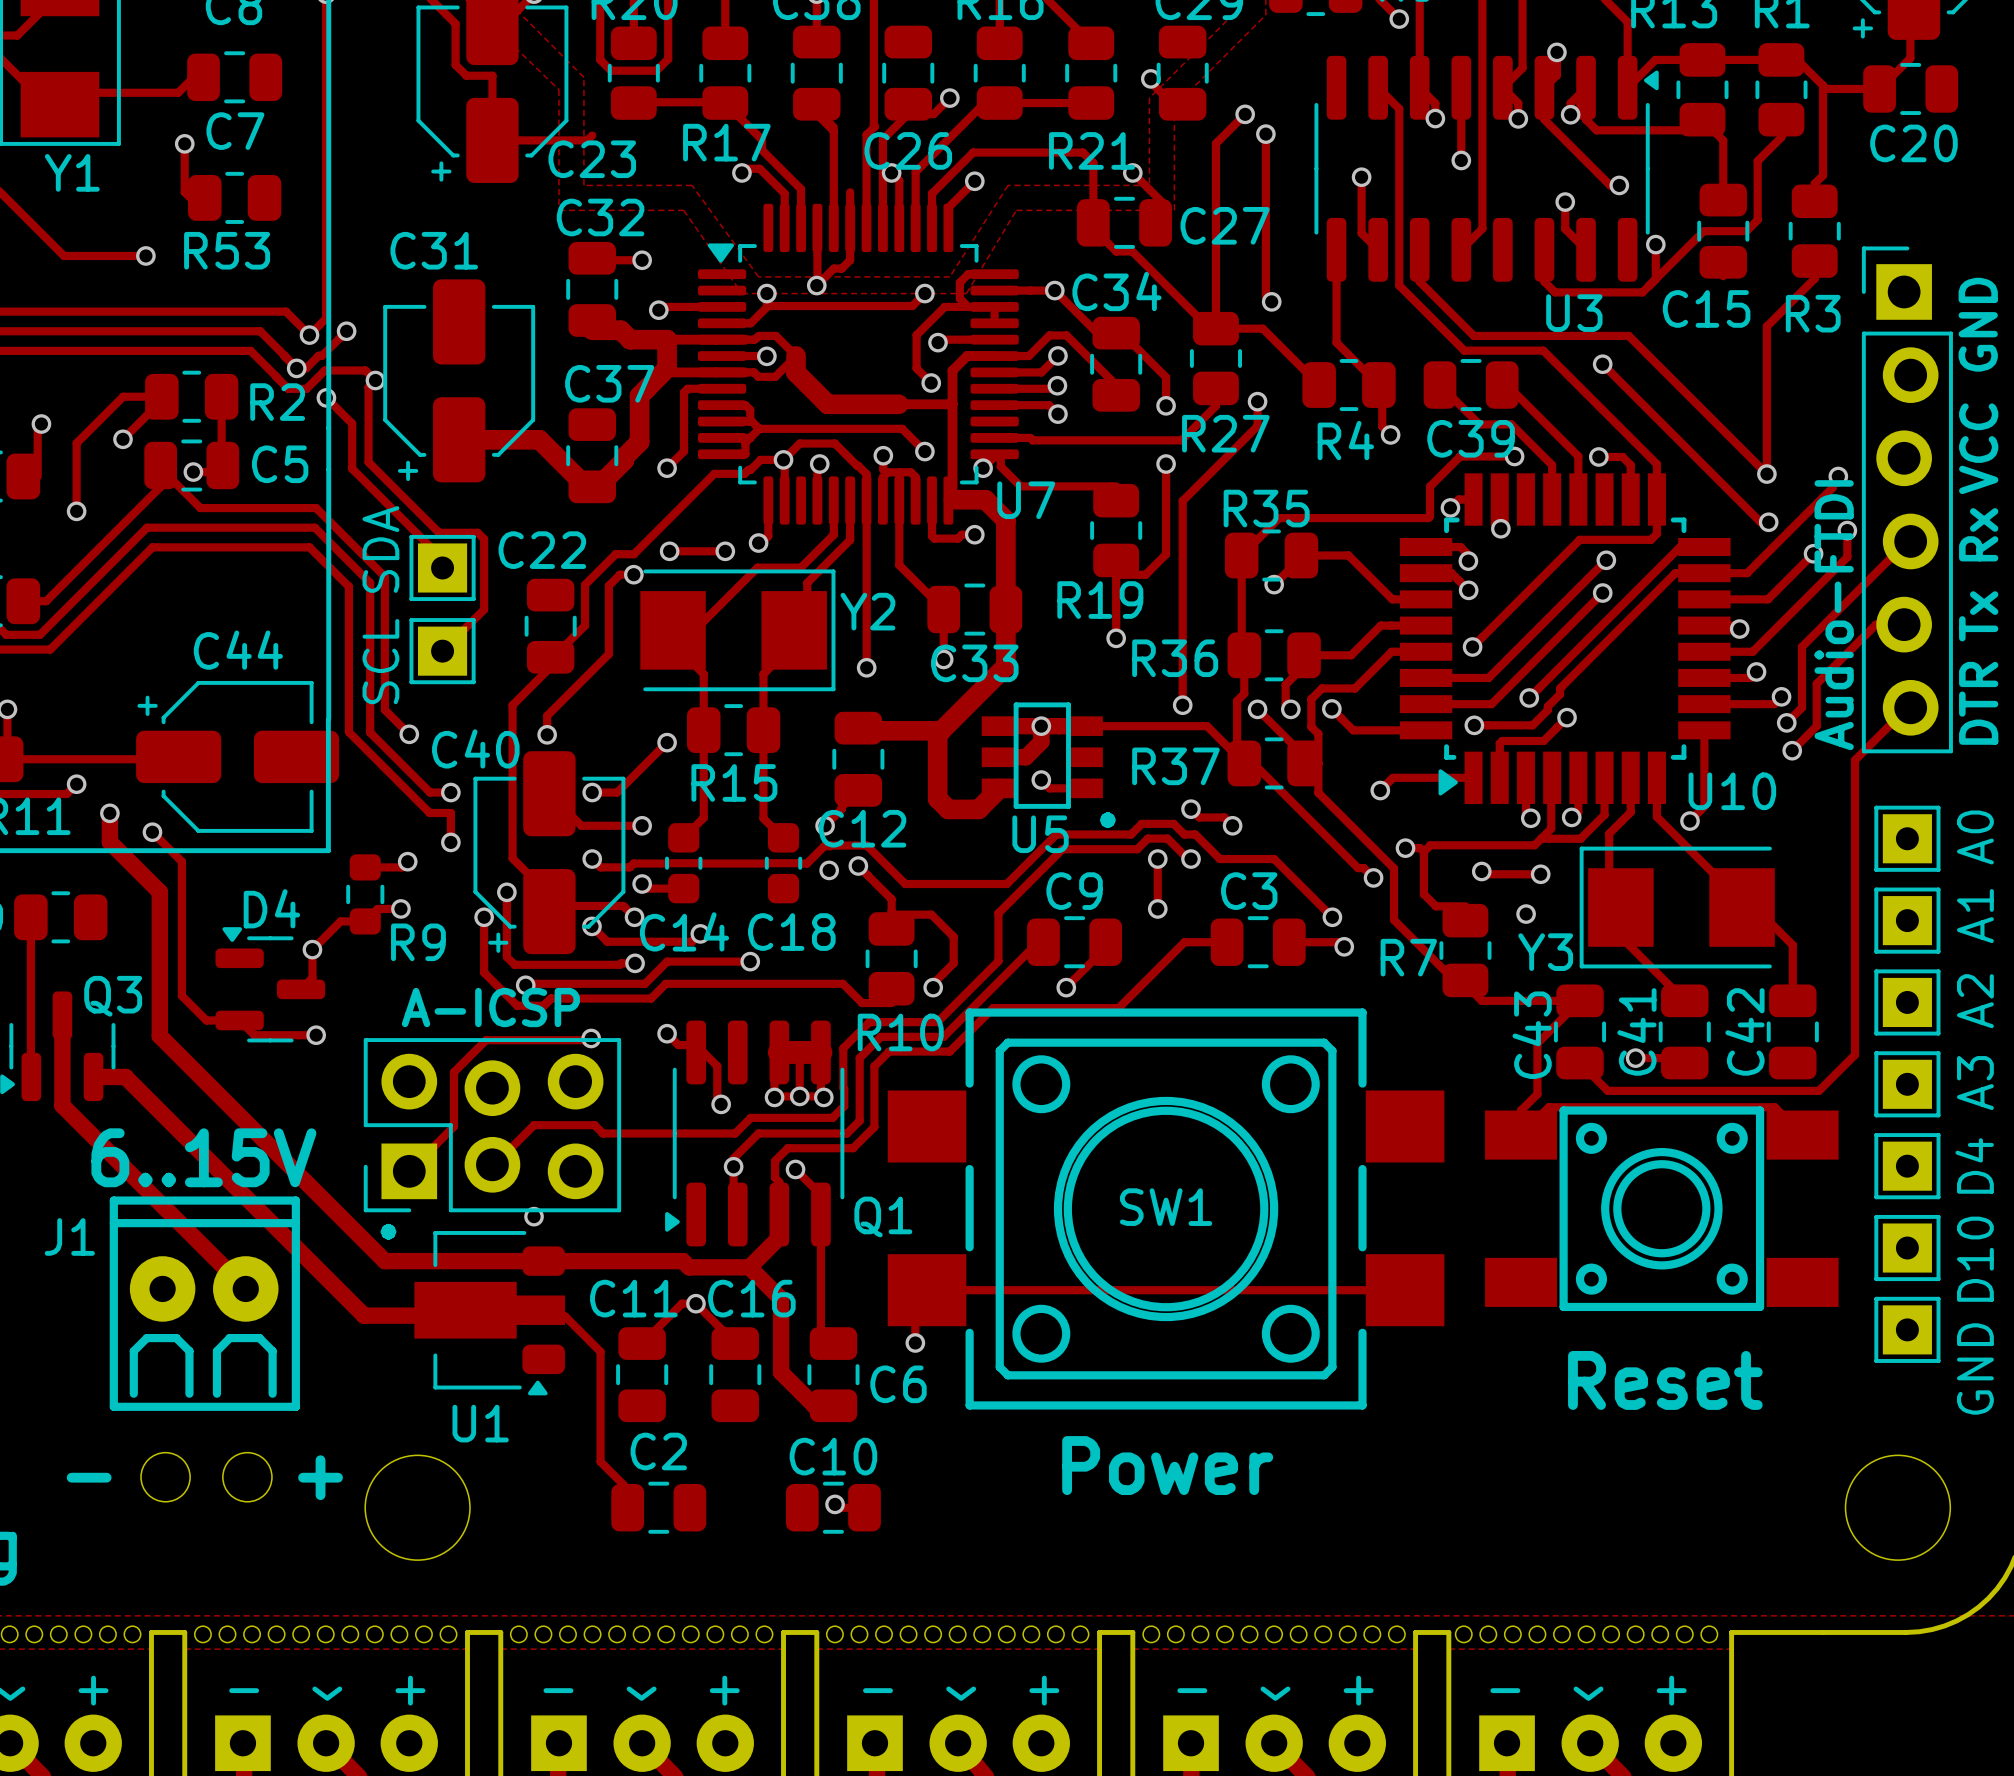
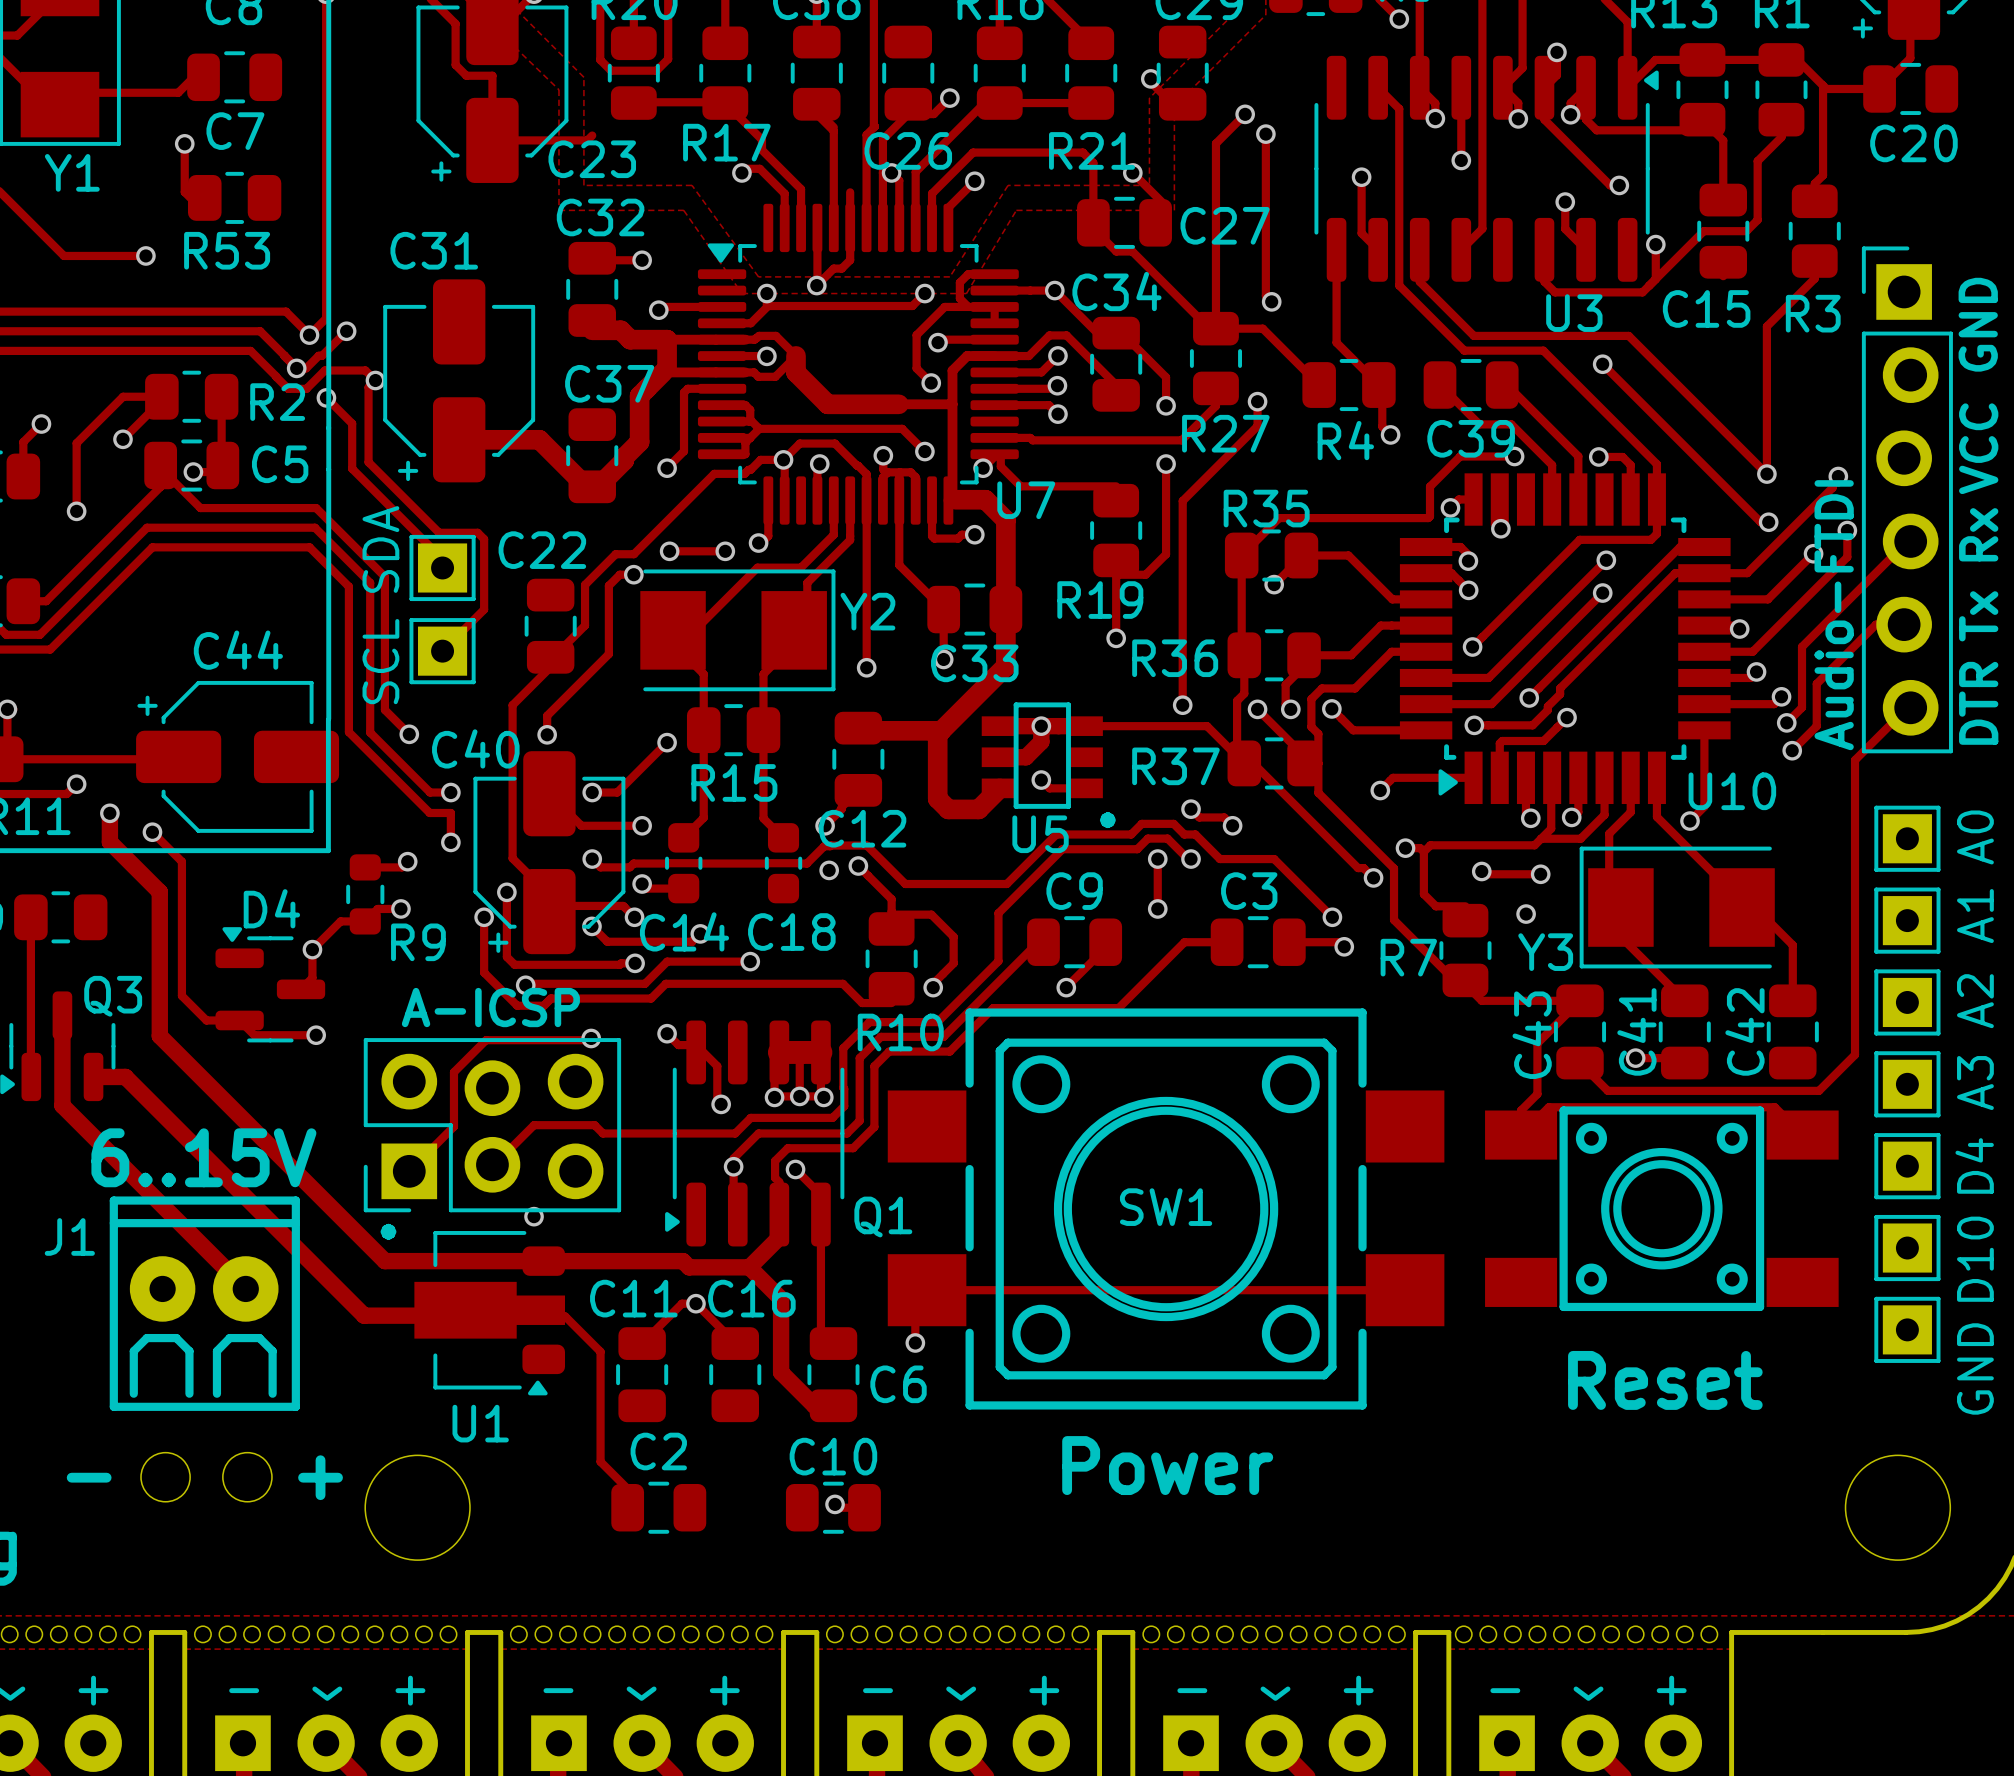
track: (37, 427) (37, 476) -> (37, 427) (23, 442) (23, 476)

